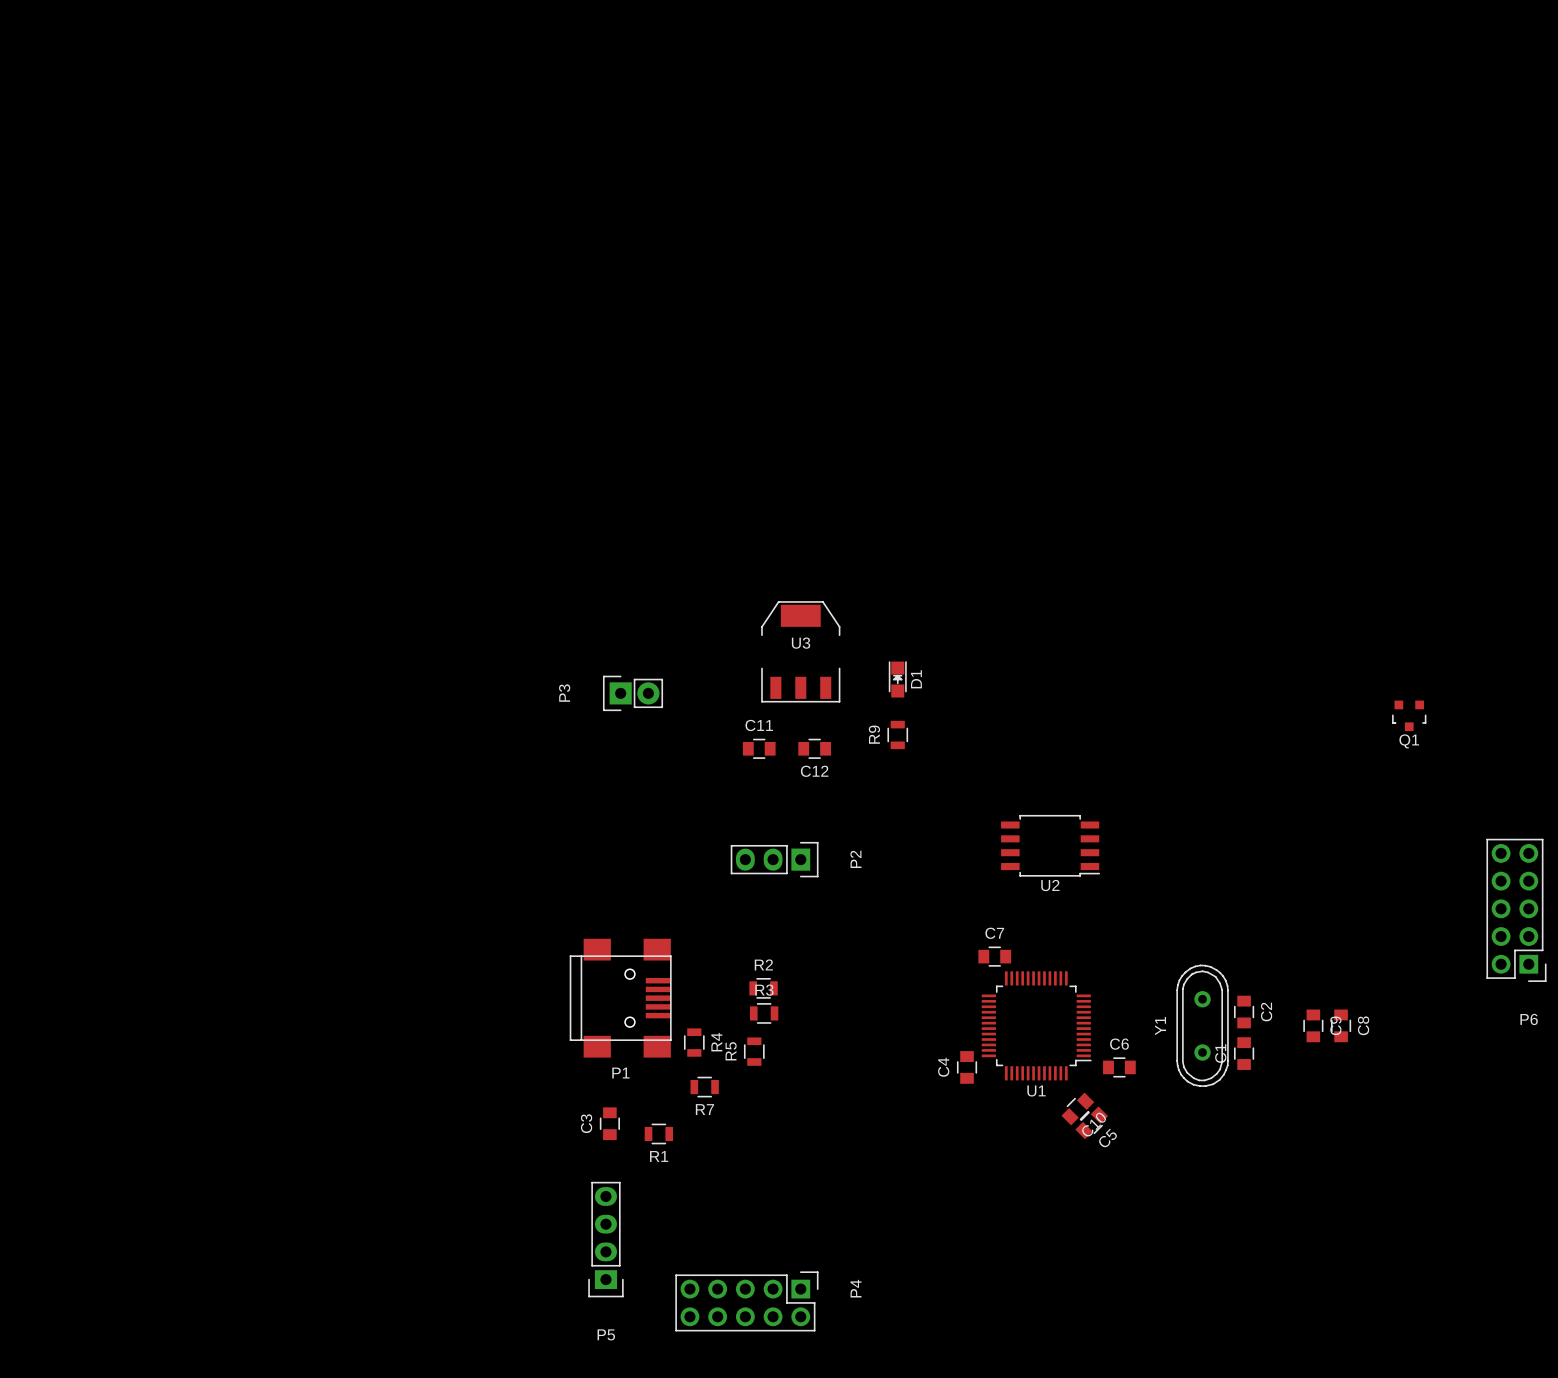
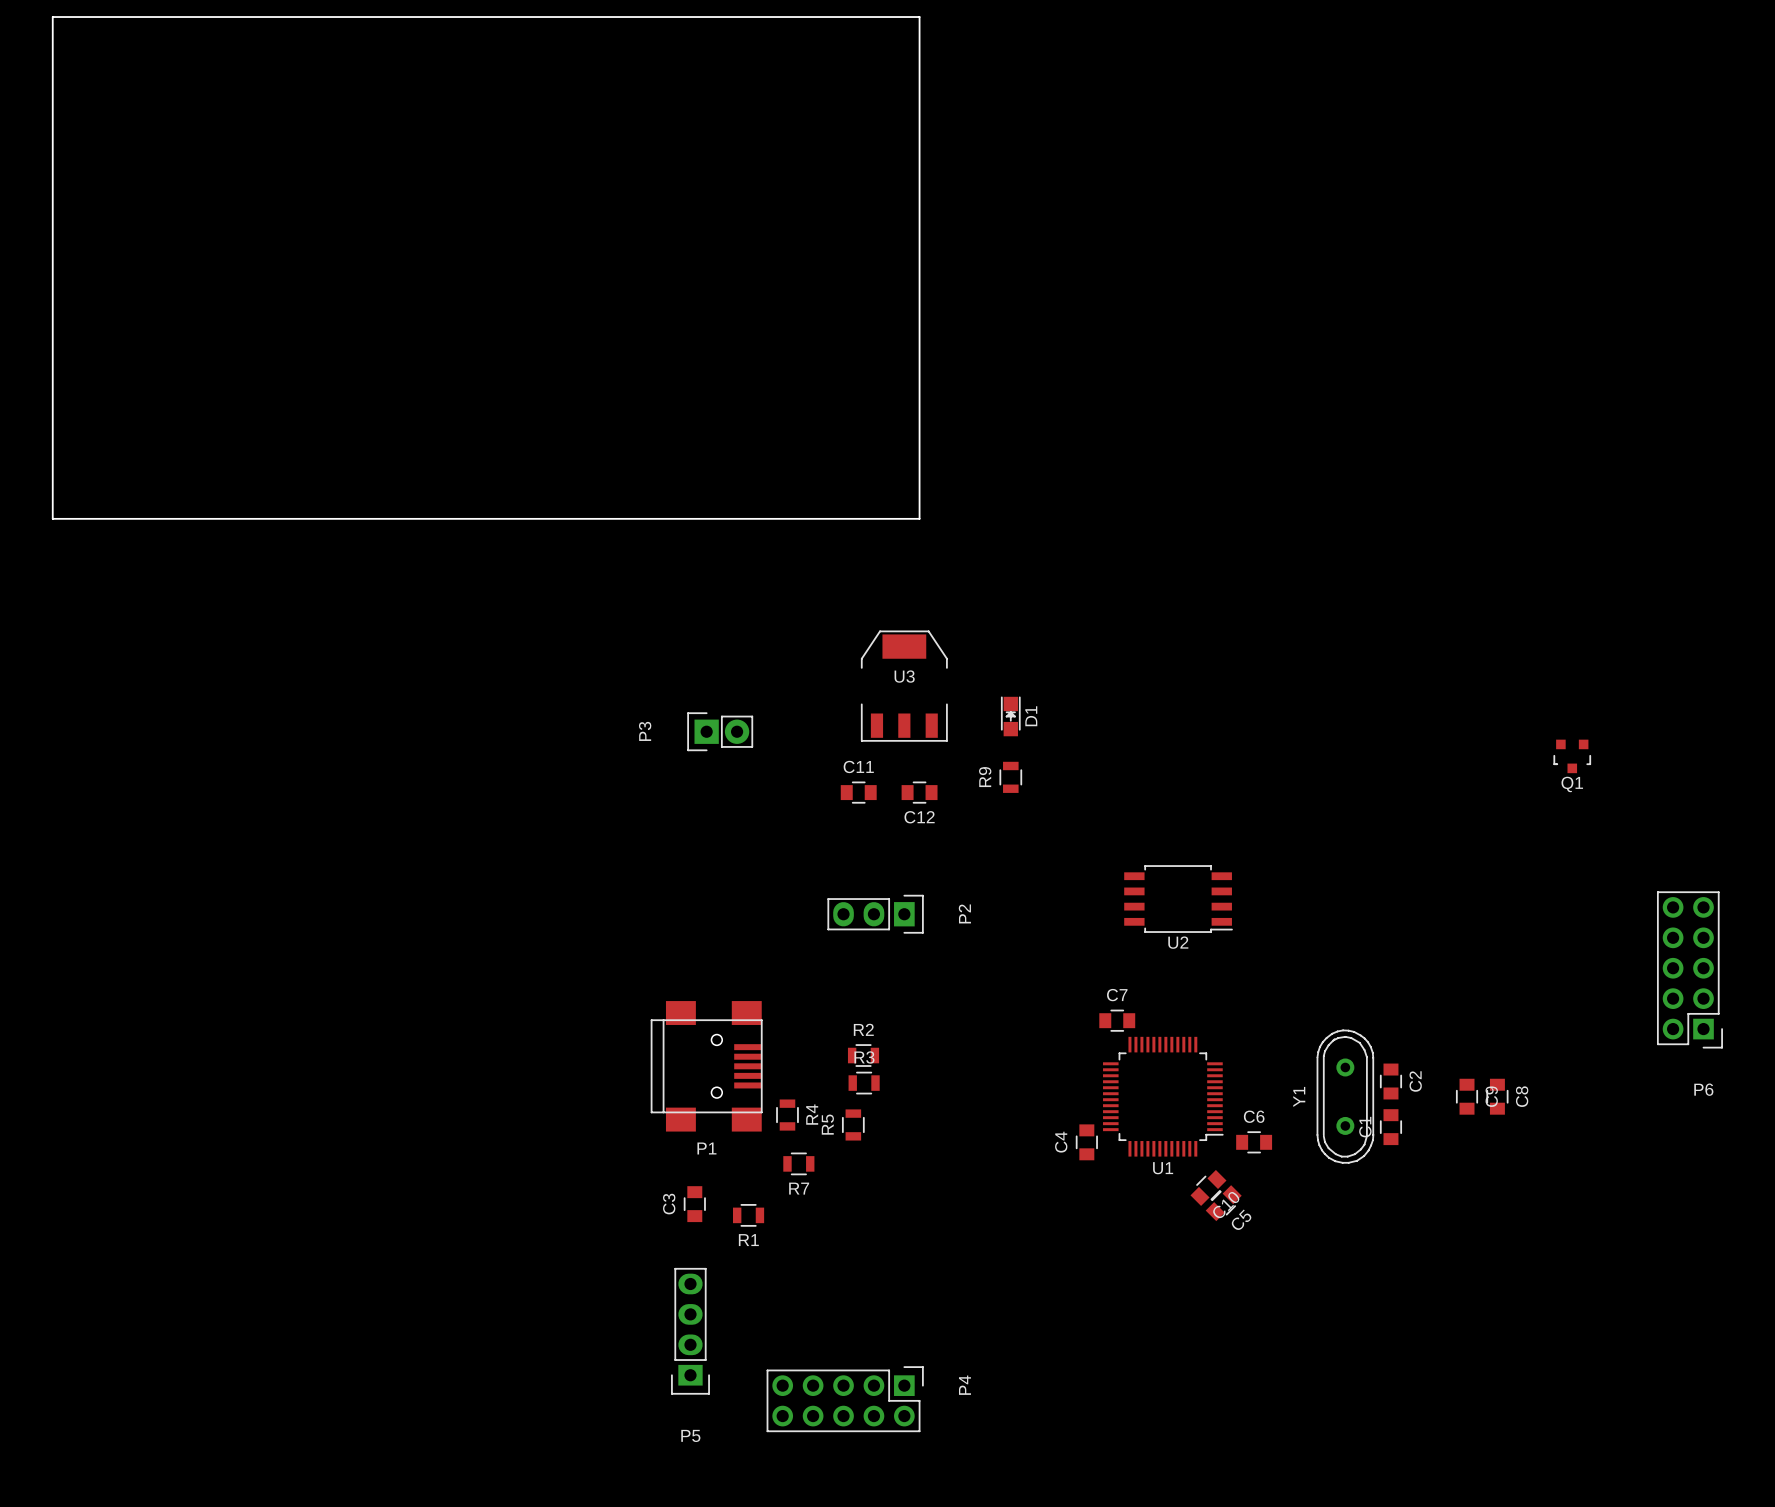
board edge: none -> (52, 17) (52, 518) (919, 518) (919, 17) (52, 17)

